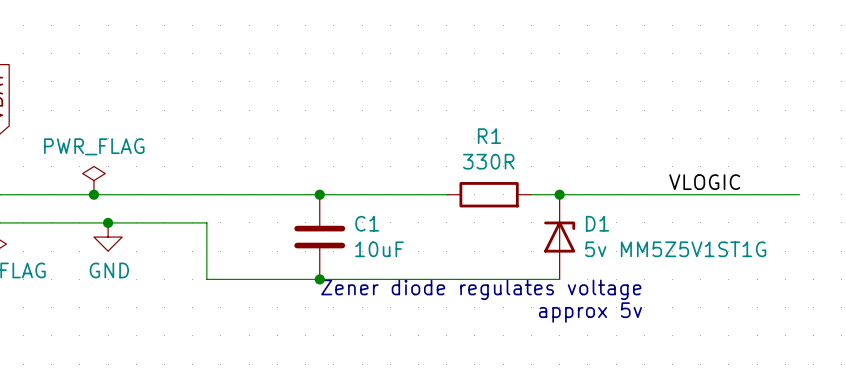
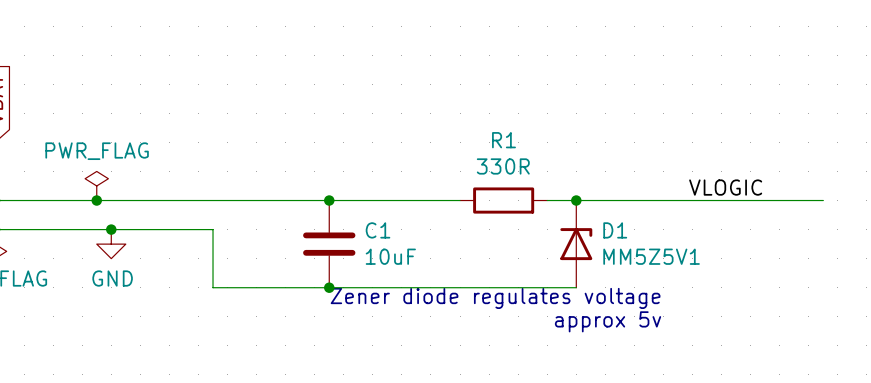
D1 value: 5v MM5Z5V1ST1G (675, 249) -> MM5Z5V1 (651, 256)

